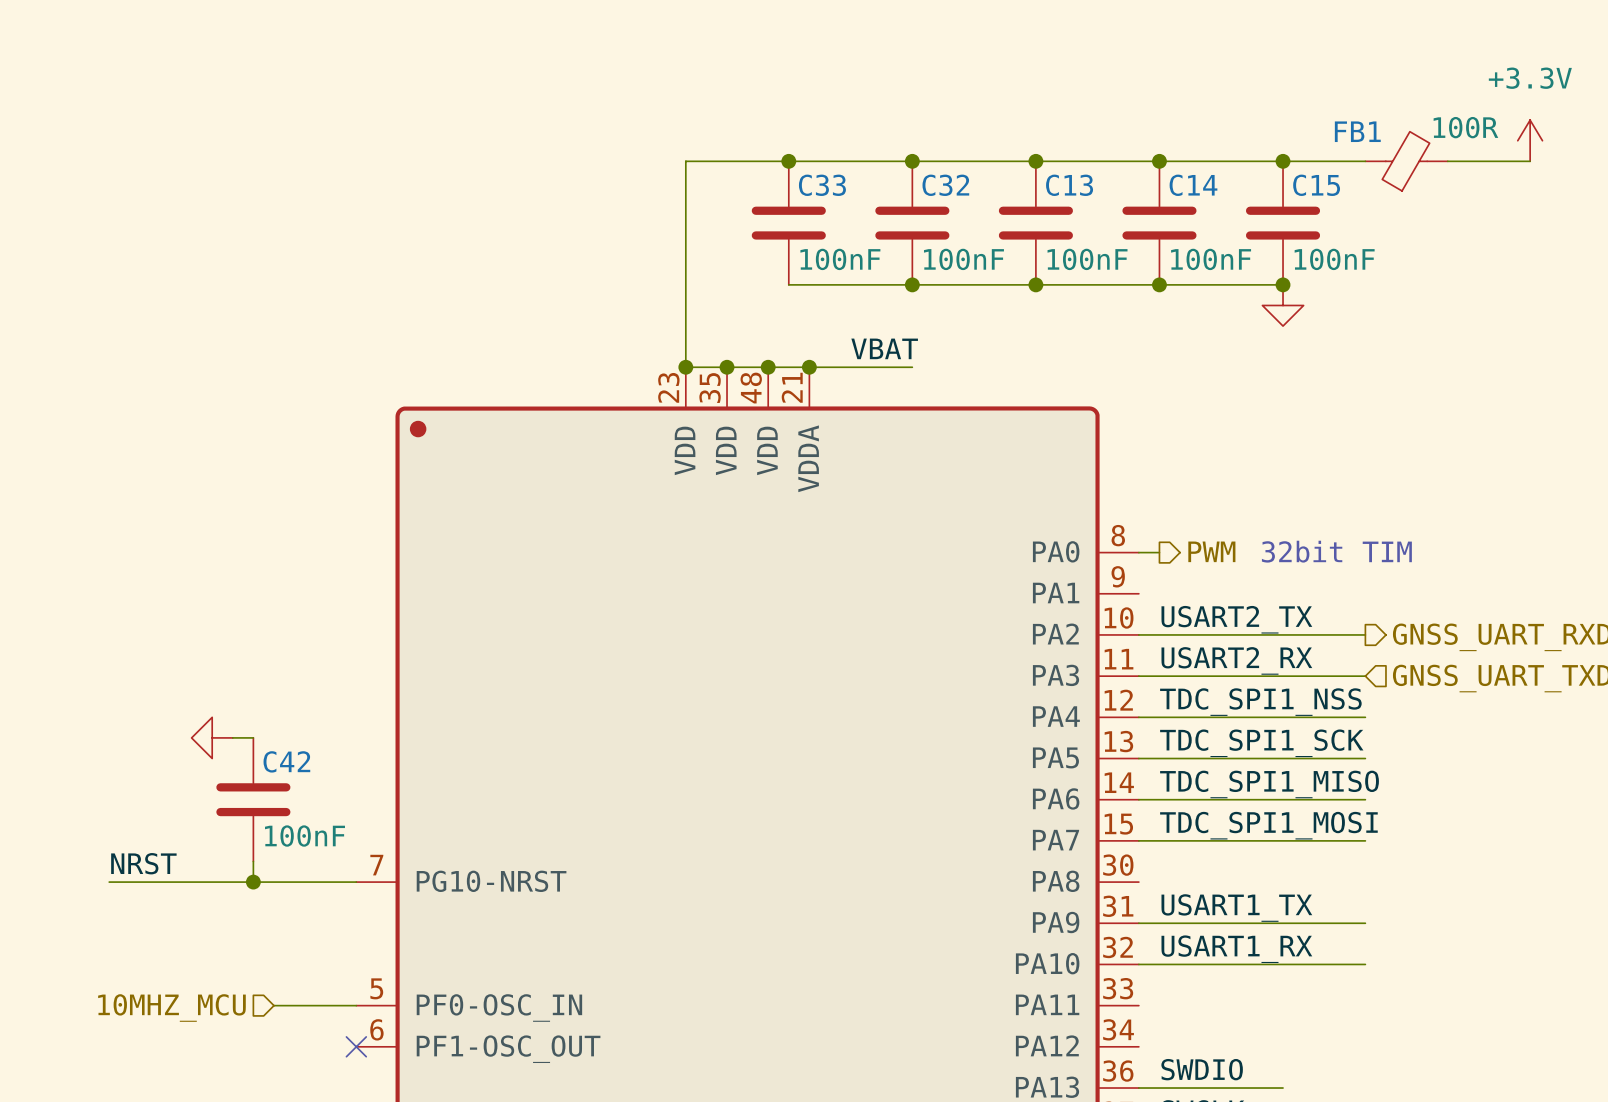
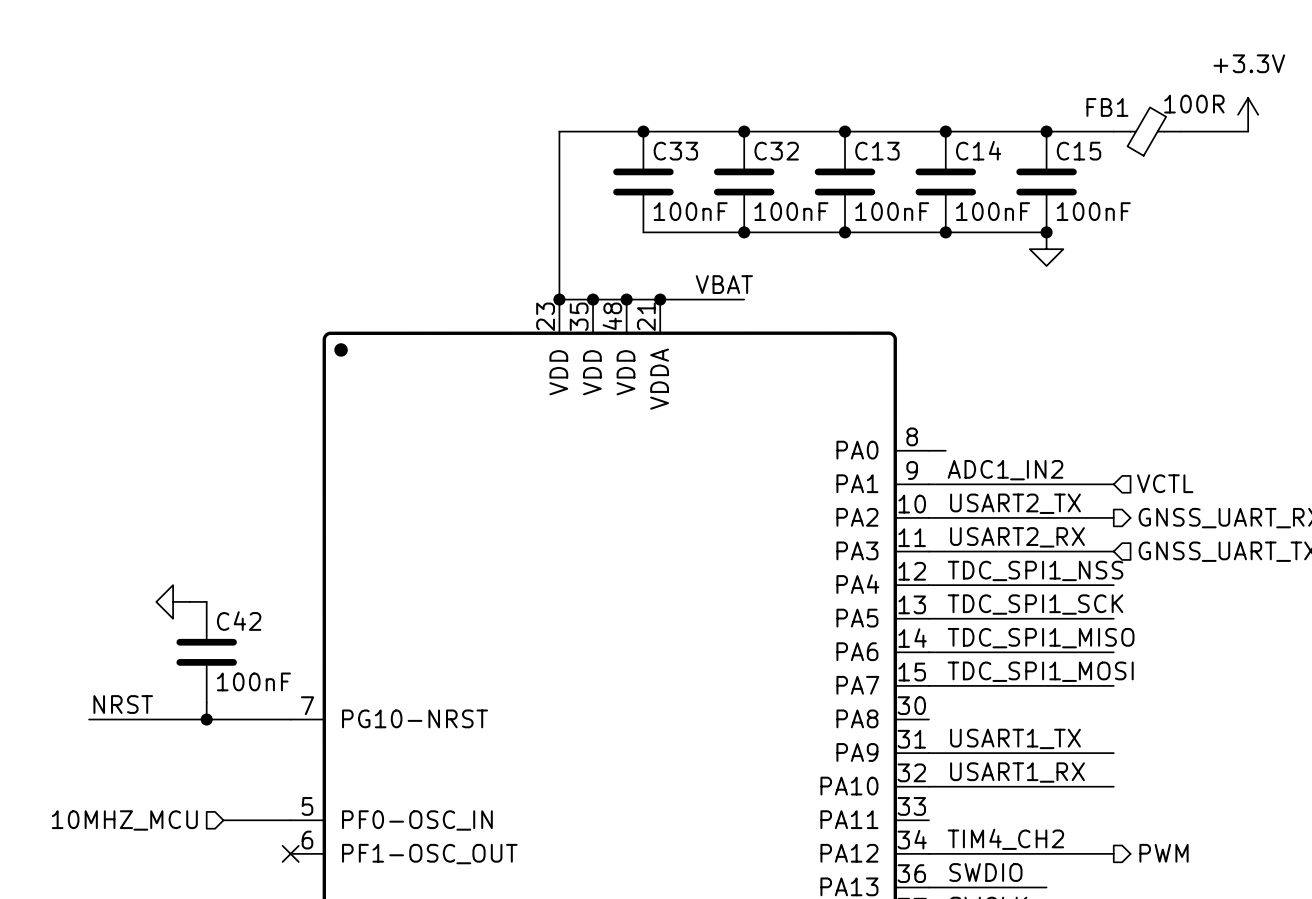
hierarchical label: PWM (1211, 551) -> none
text: 32bit TIM (1336, 551) -> none
label: none -> ADC1_IN2 (1005, 470)
wire: none -> (928, 484) (1113, 484)
hierarchical label: none -> VCTL (1165, 483)
label: none -> TIM4_CH2 (1005, 839)
wire: none -> (928, 853) (1113, 853)
hierarchical label: none -> PWM (1164, 853)

